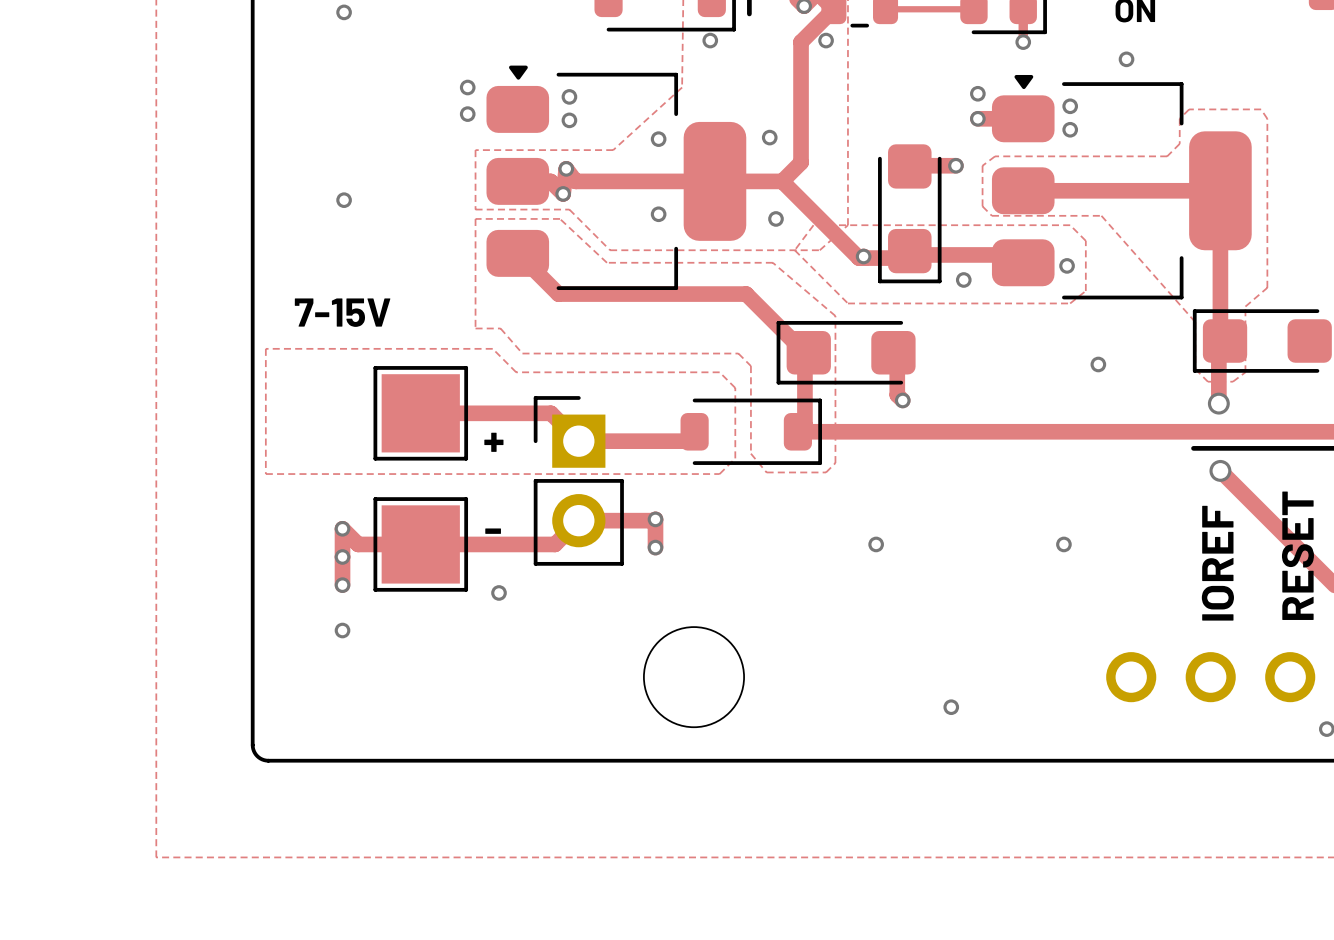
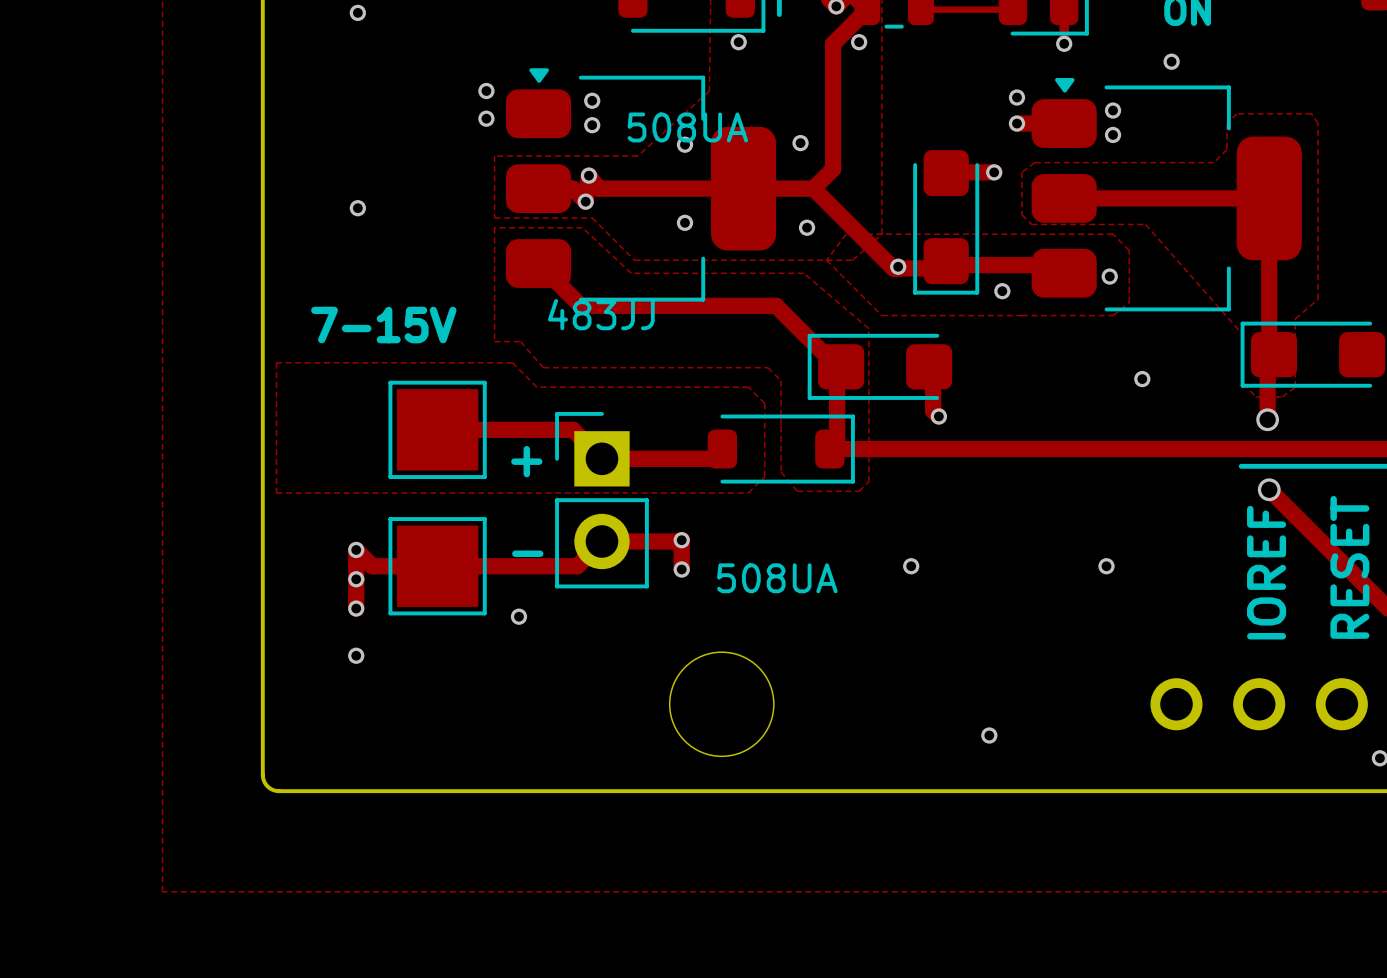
part text: none -> 508UA (687, 127)
part text: none -> 483JJ (601, 314)
part text: none -> 508UA (777, 578)

